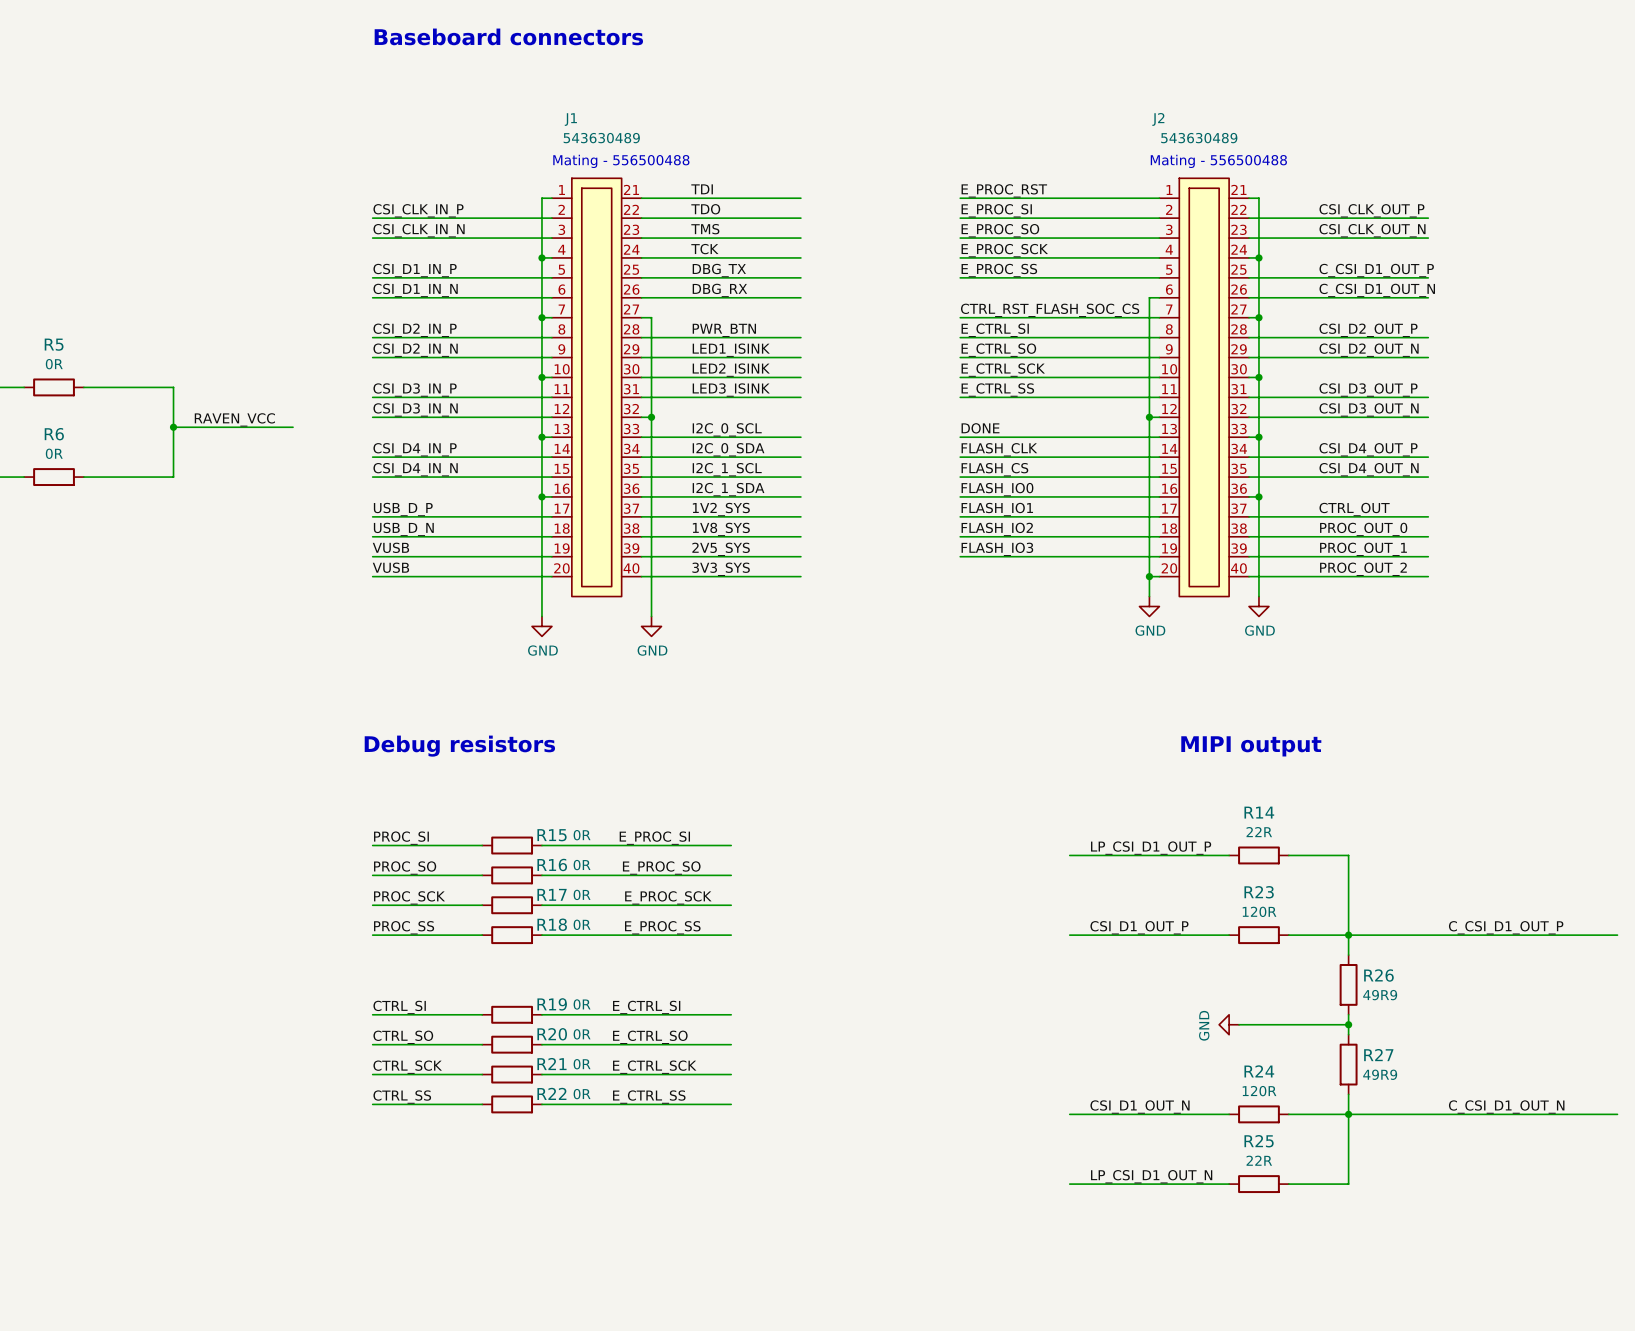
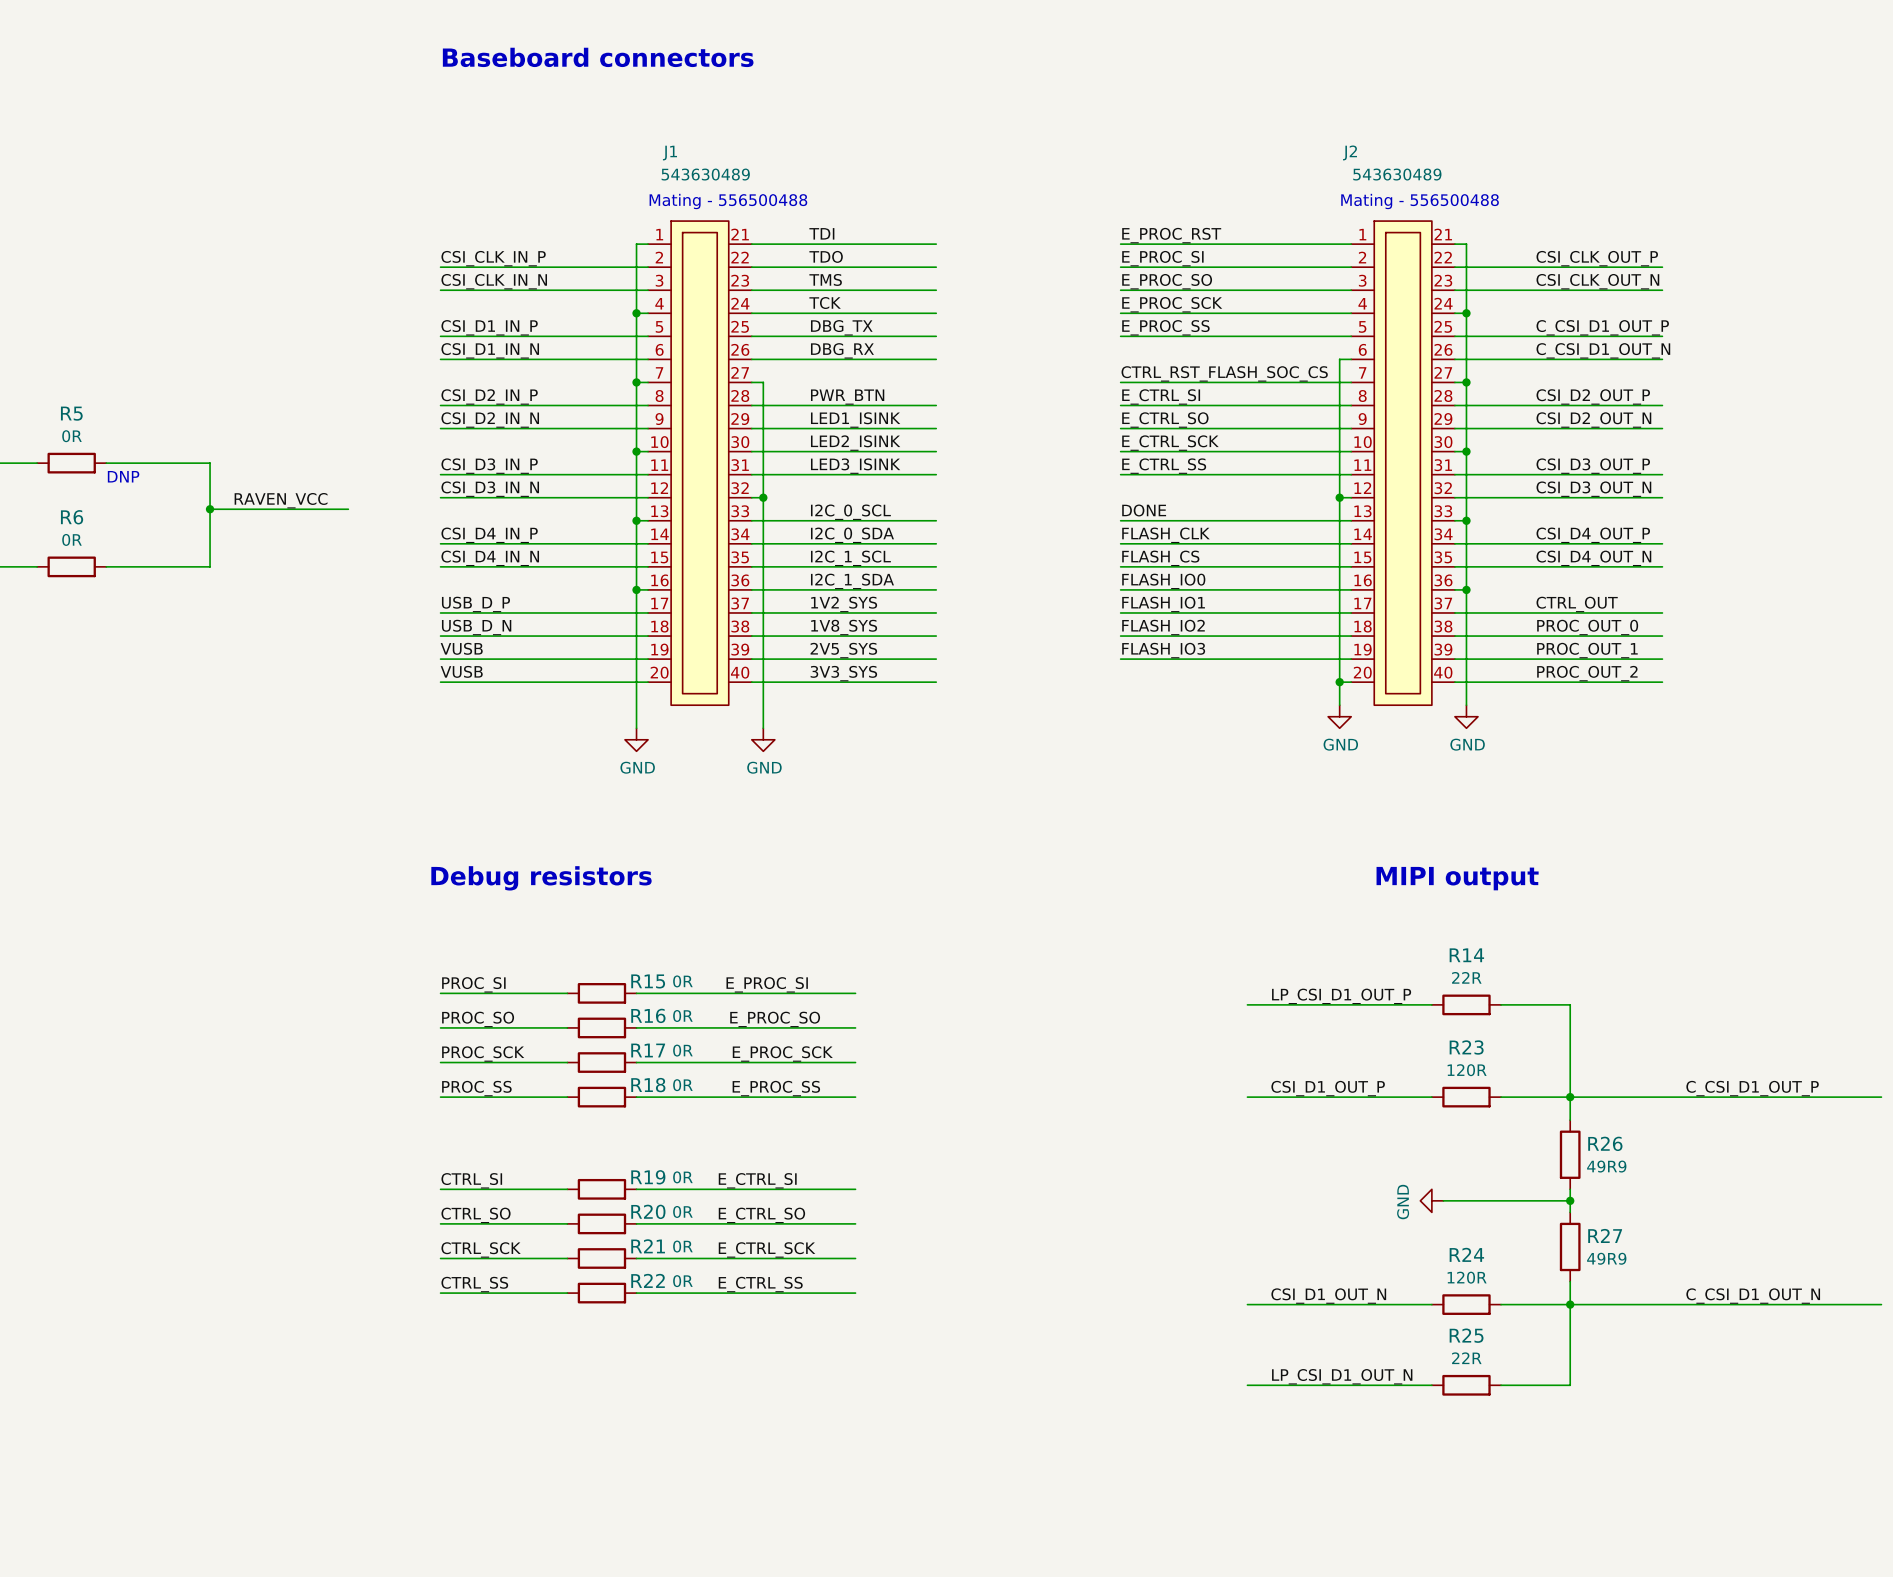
text: none -> DNP (123, 476)

